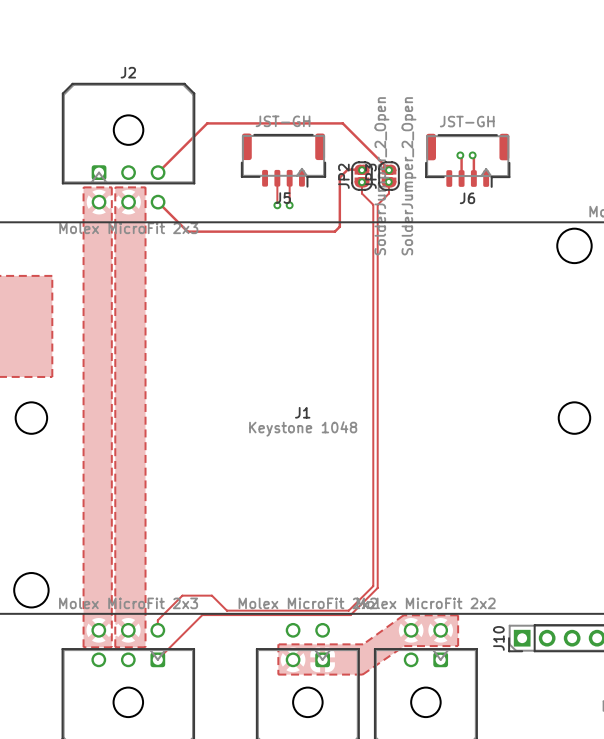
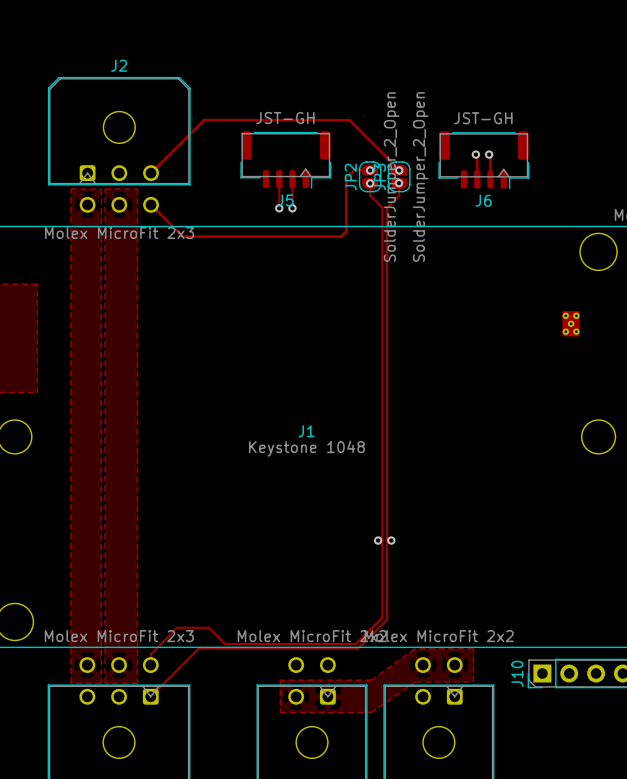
part: none -> (571, 323)
via: none -> (378, 540)
via: none -> (391, 540)

